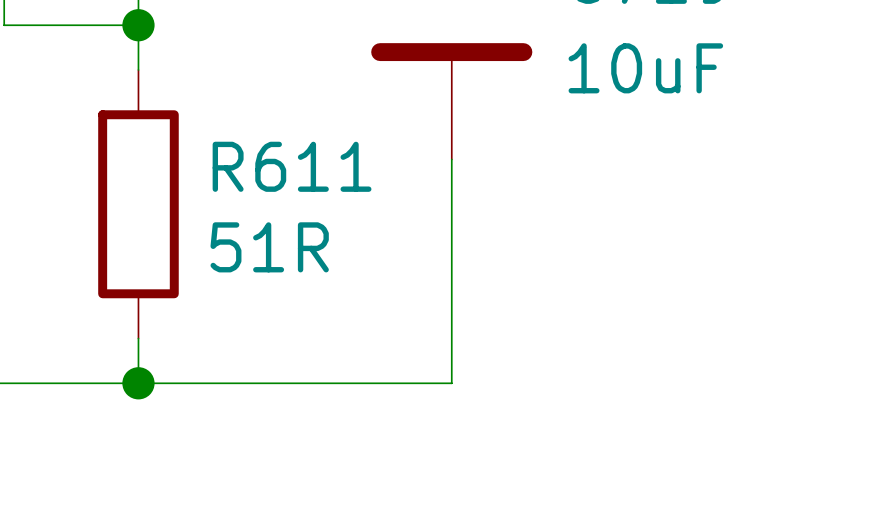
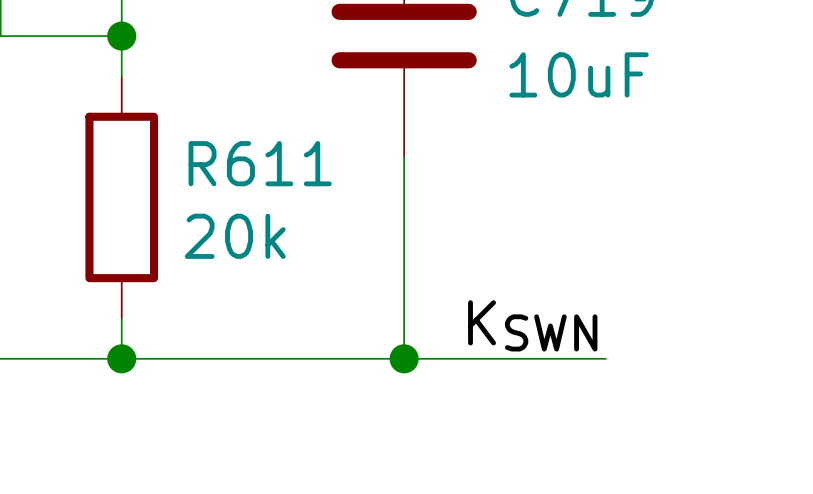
R611 value: 51R (269, 247) -> 20k (235, 236)
label: none -> KSWN (532, 325)
wire: none -> (404, 358) (605, 358)
junction: none -> (404, 358)

